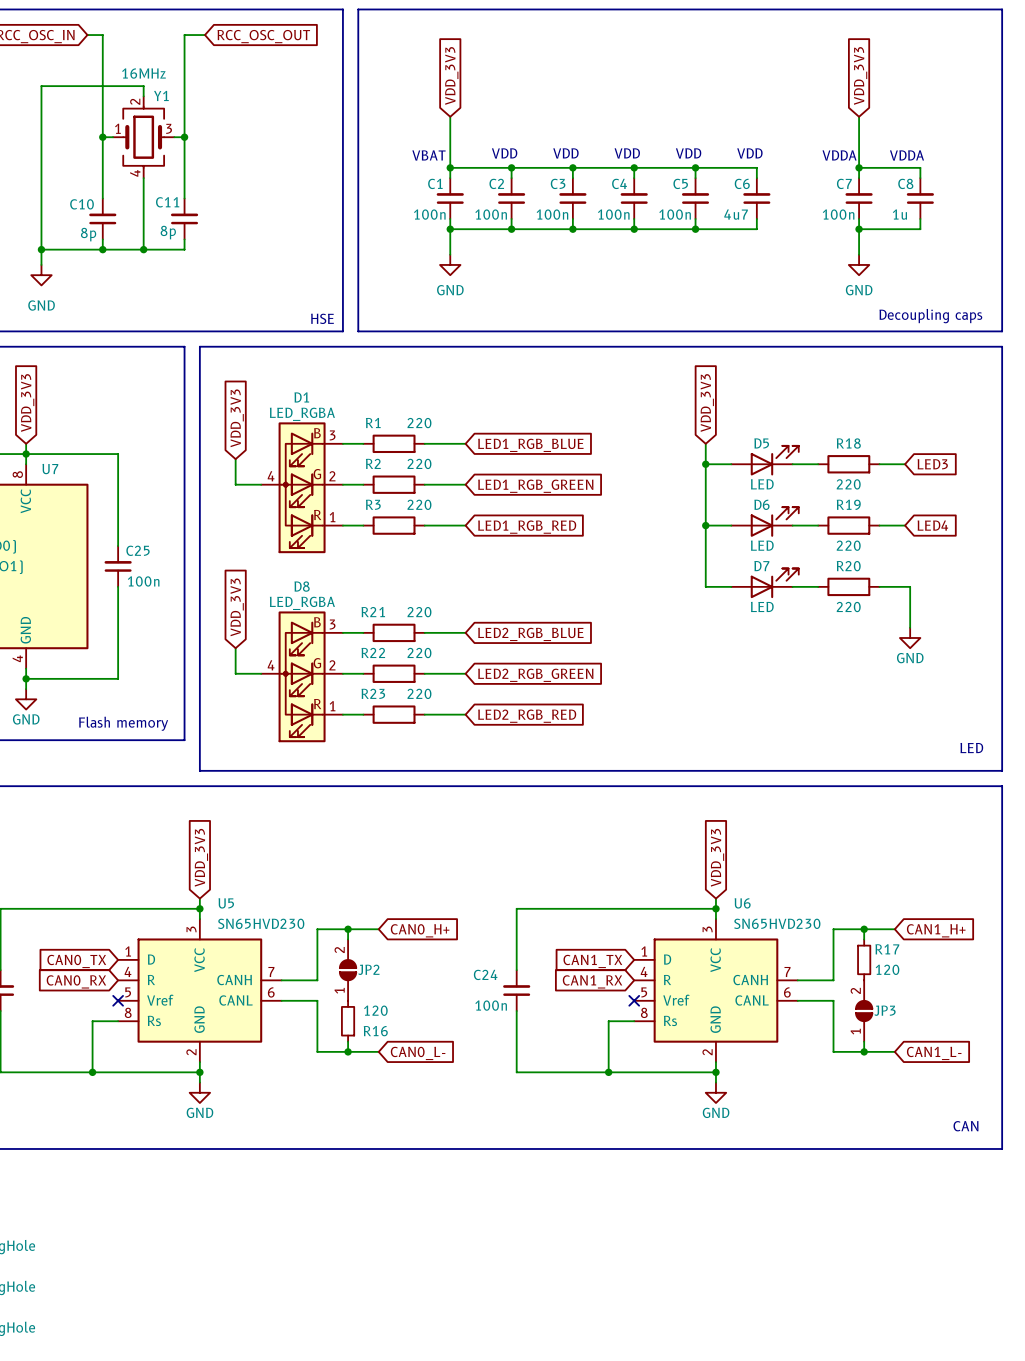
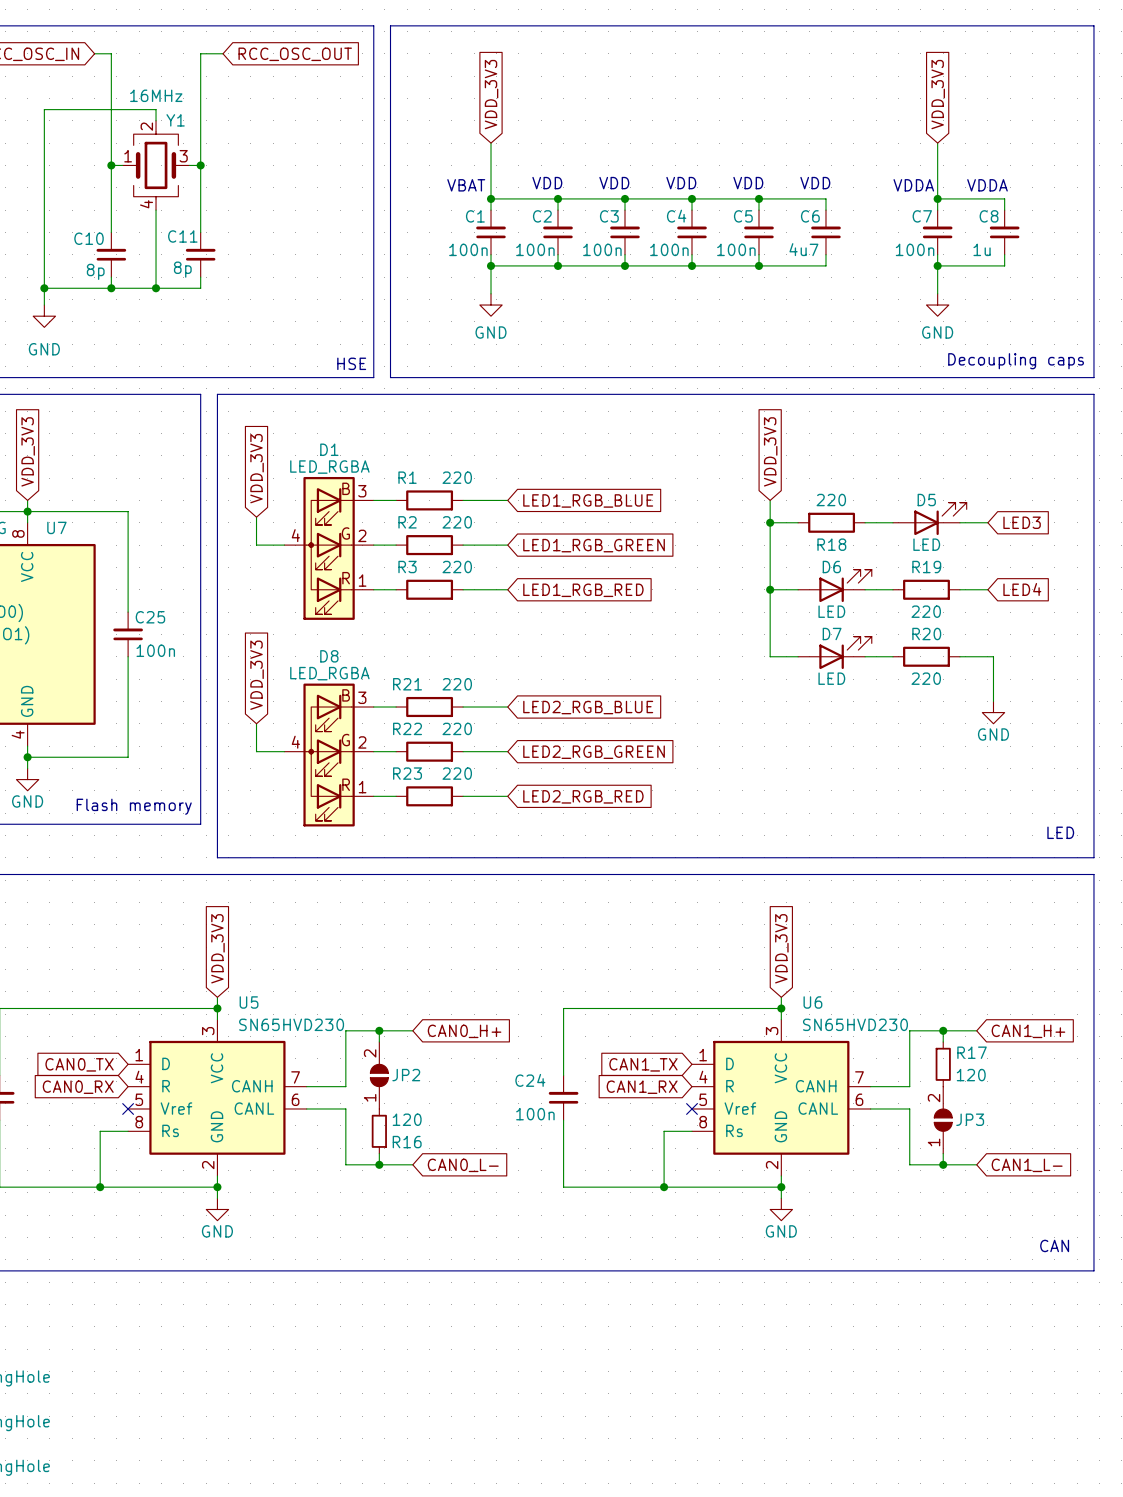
R18 name position: R18 (848, 443) -> R18 (831, 544)
D5 position: (765, 460) -> (929, 518)
R18 position: (848, 464) -> (831, 522)
R18 value position: 220 (848, 484) -> 220 (831, 500)

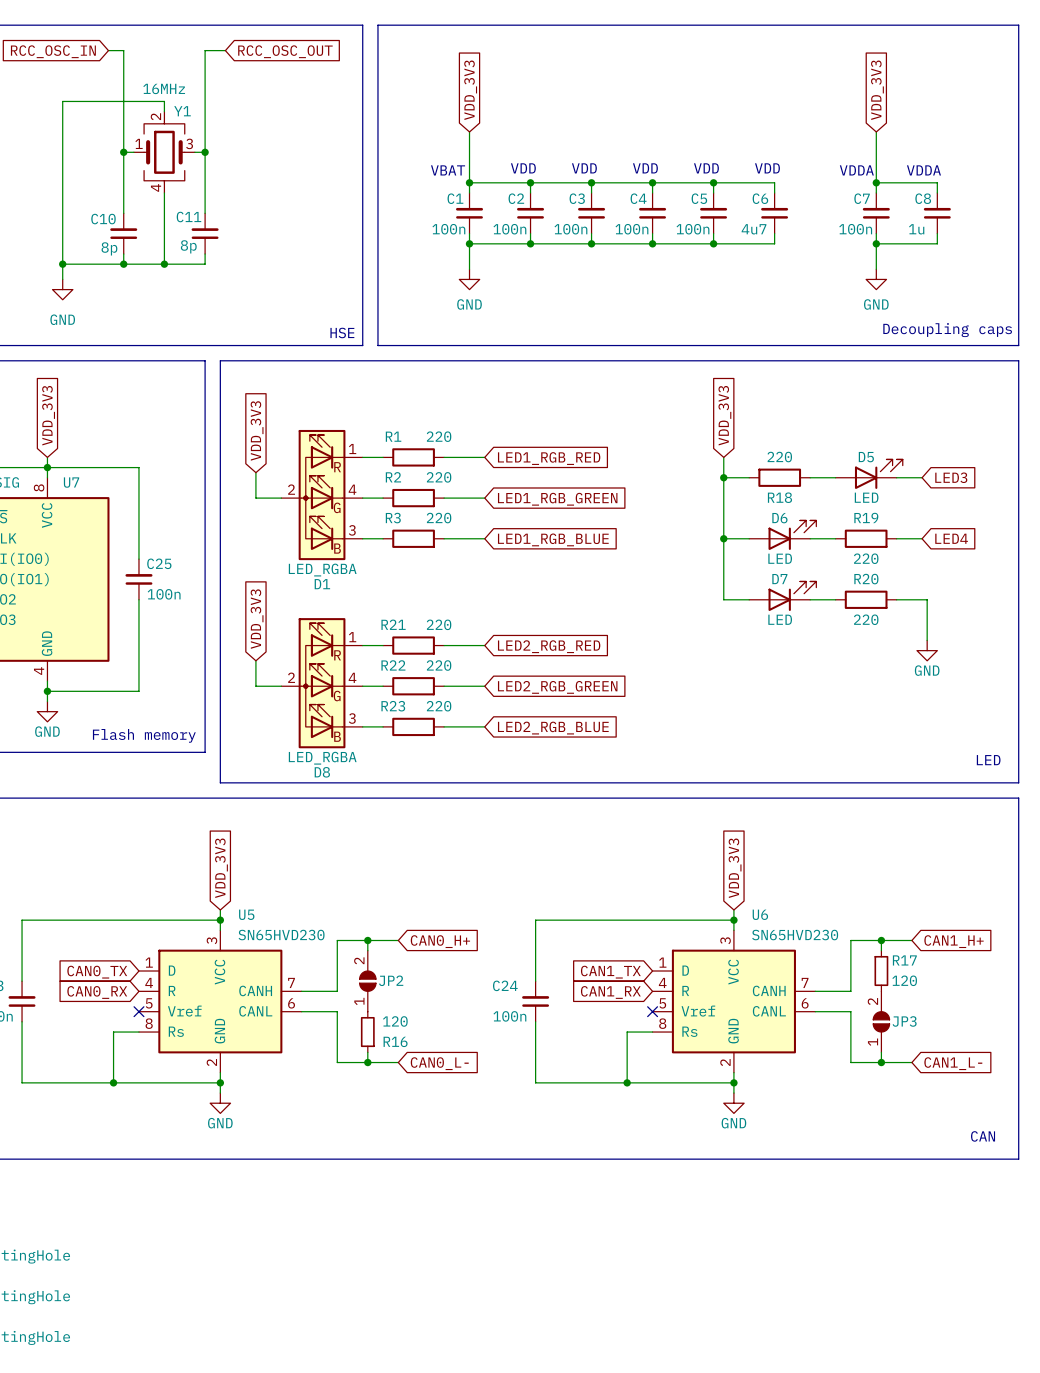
D1 name position: D1 (329, 449) -> D1 (322, 584)
D1 value position: LED_RGBA (329, 467) -> LED_RGBA (322, 570)
D1 symbol: [284, 476, 374, 620] -> [281, 429, 363, 561]
global label: LED1_RGB_BLUE (588, 500) -> LED1_RGB_RED (549, 458)
global label: LED1_RGB_RED (583, 590) -> LED1_RGB_BLUE (553, 539)
D8 name position: D8 (329, 656) -> D8 (322, 772)
D8 value position: LED_RGBA (329, 673) -> LED_RGBA (322, 758)
D8 symbol: [284, 683, 374, 827] -> [281, 618, 363, 749]
global label: LED2_RGB_BLUE (588, 707) -> LED2_RGB_RED (549, 646)
global label: LED2_RGB_RED (583, 796) -> LED2_RGB_BLUE (553, 728)

